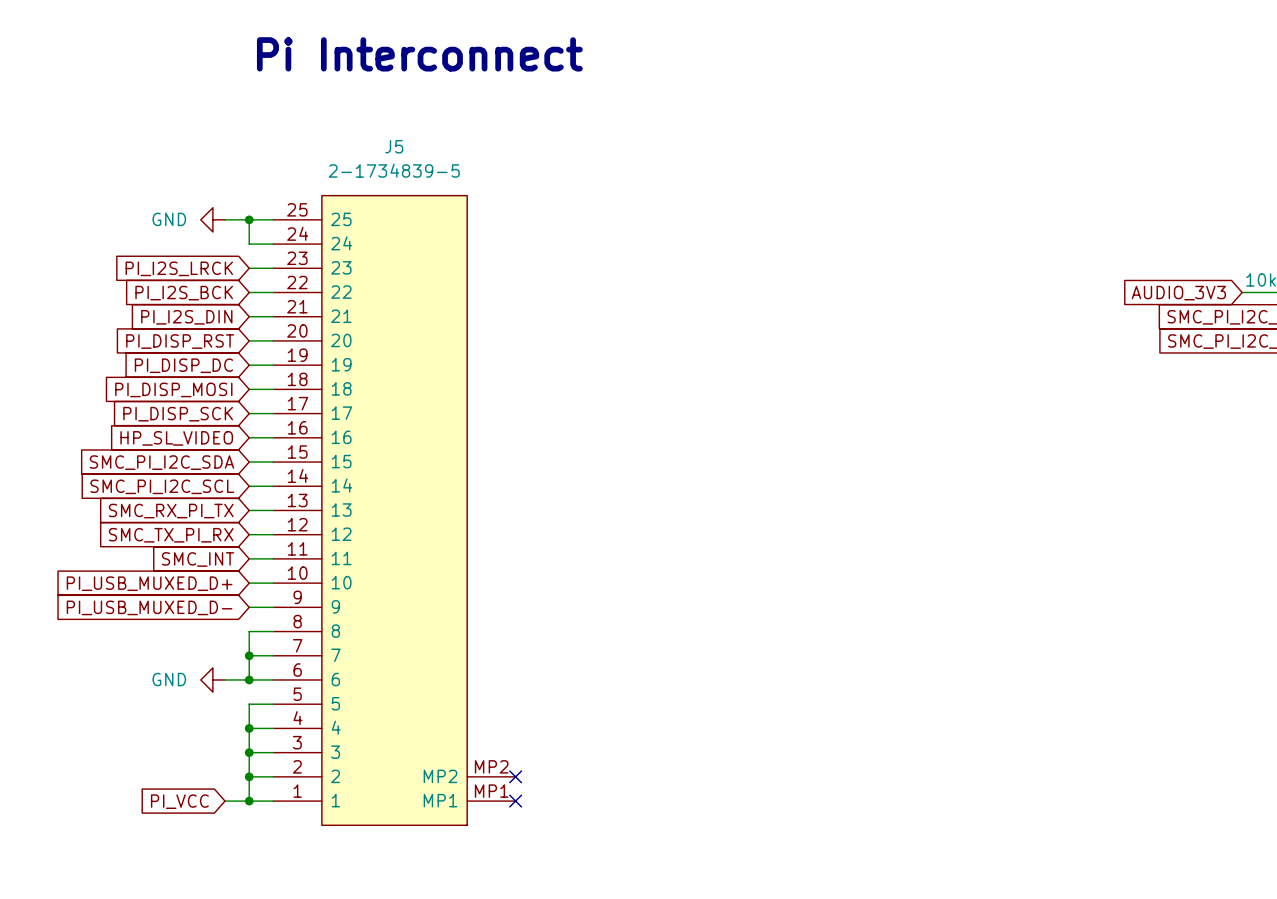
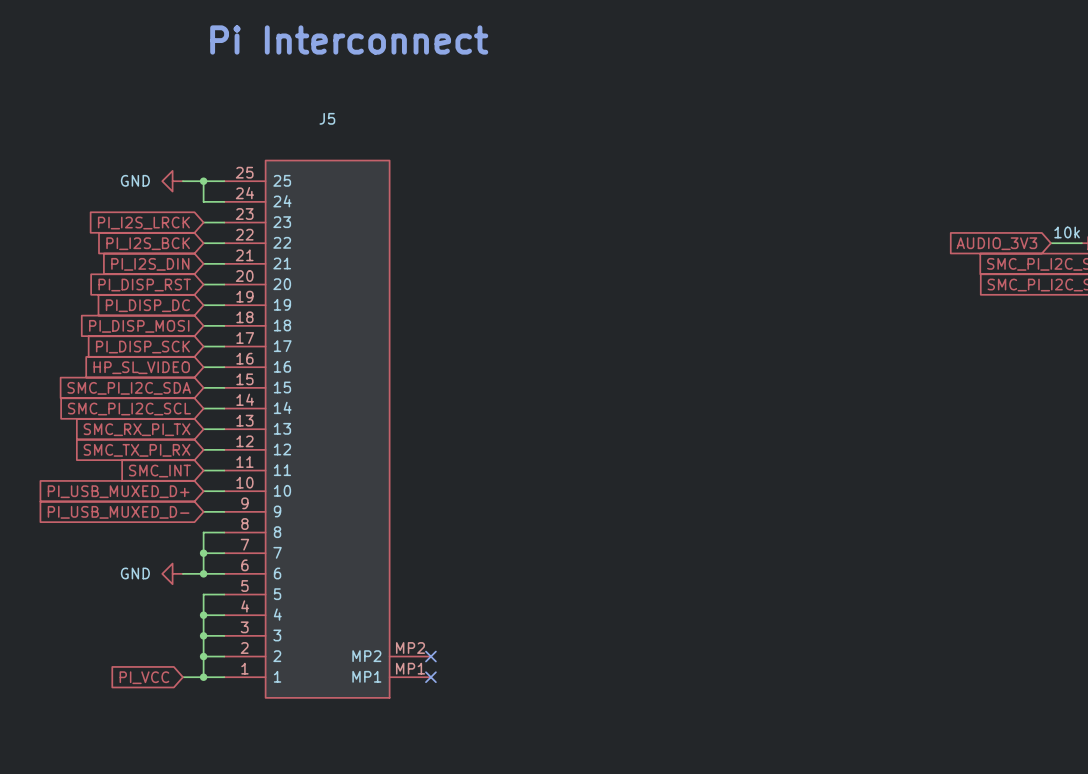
J5 value: 2-1734839-5 (394, 170) -> none

